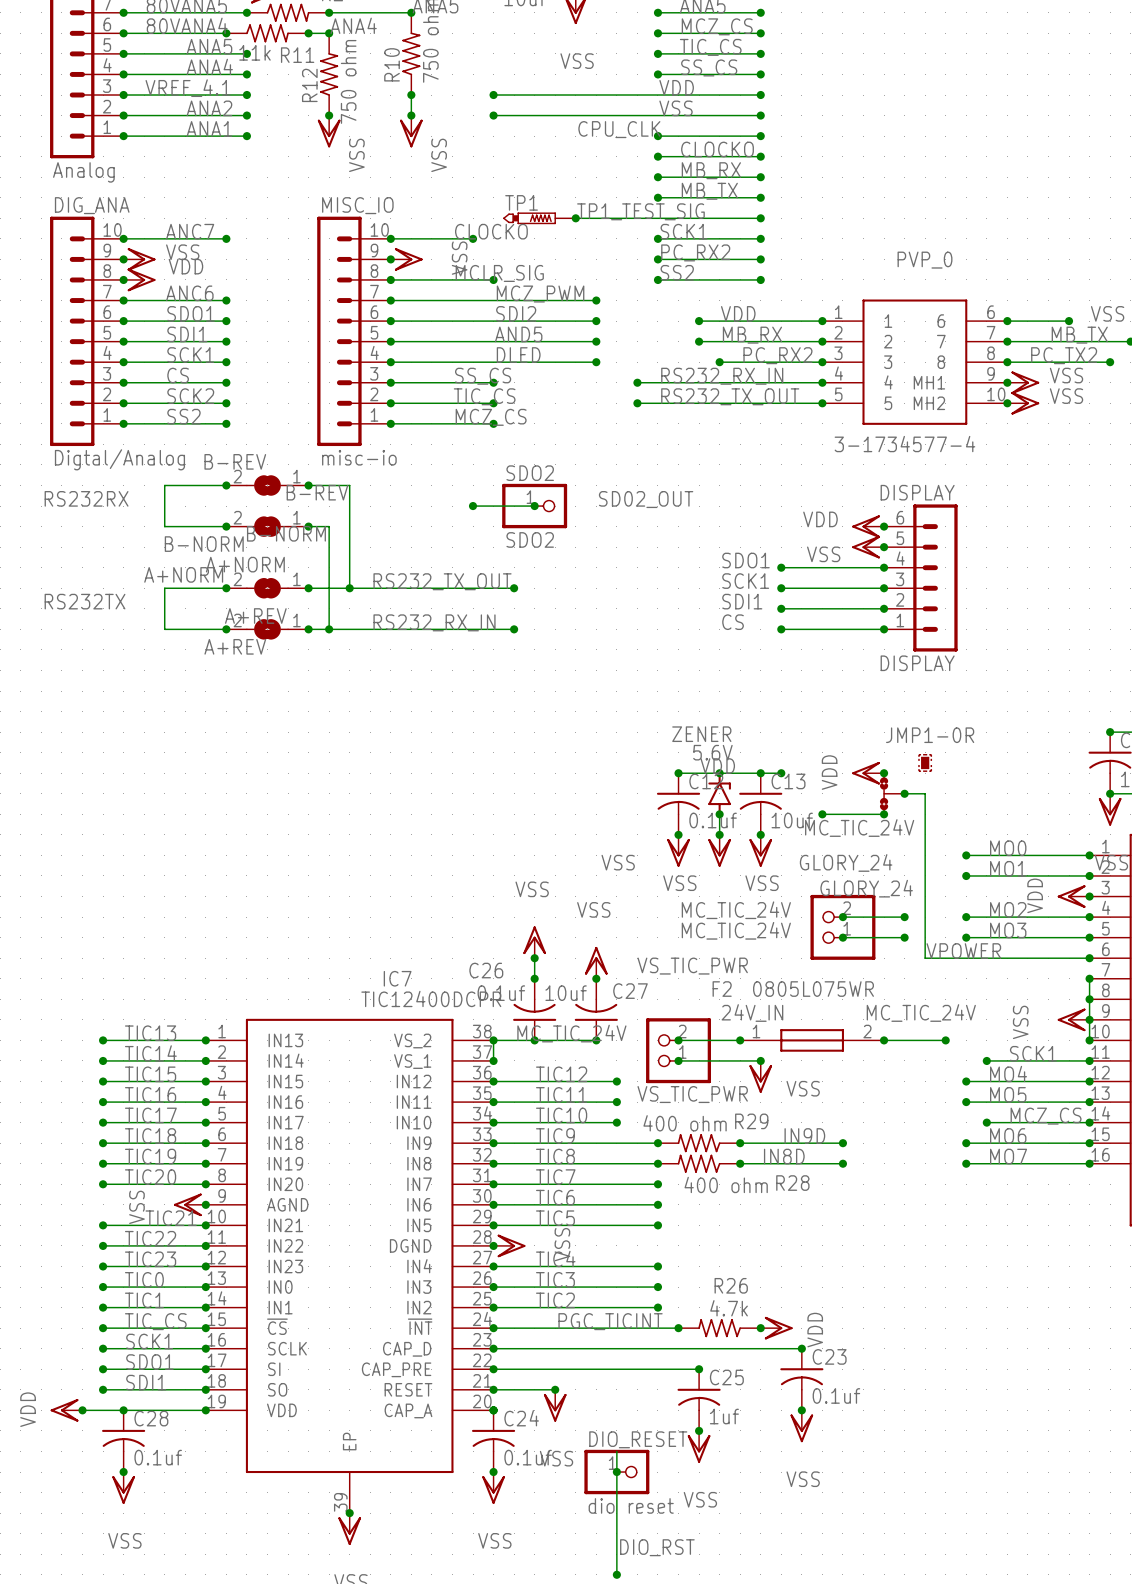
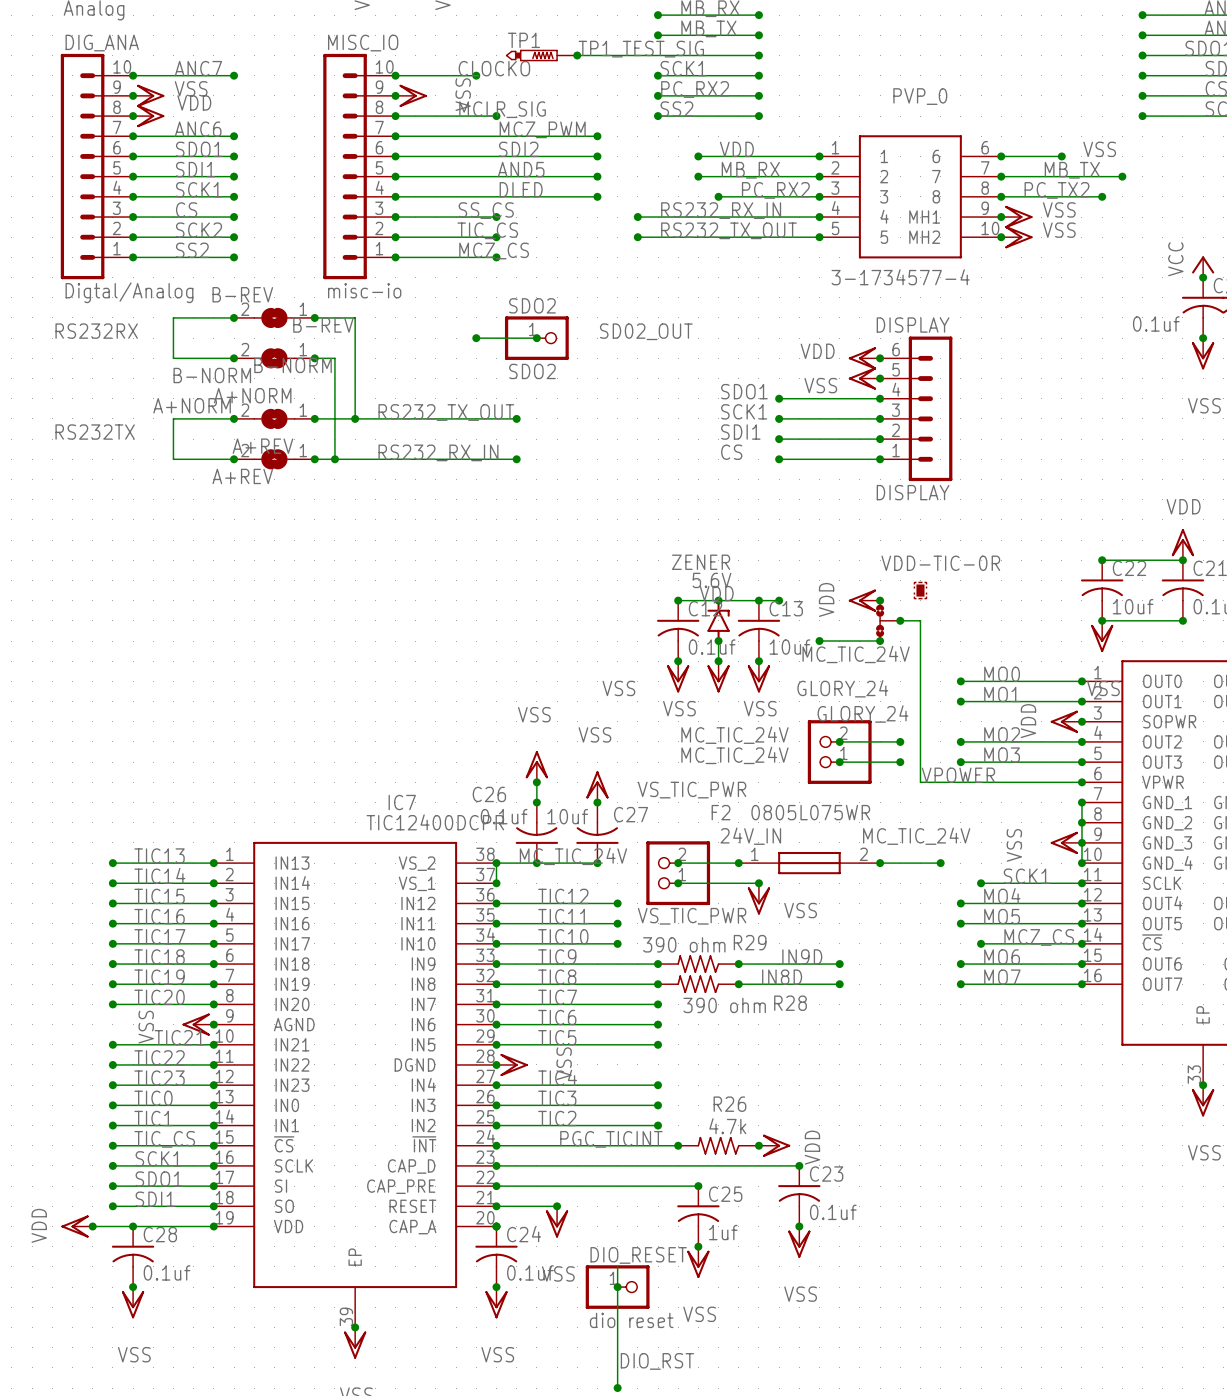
JMP1-0R name: JMP1-0R (930, 735) -> VDD-TIC-0R (940, 563)
R29 value: 400 ohm (685, 1123) -> 390 ohm (684, 944)
R28 value: 400 ohm (726, 1184) -> 390 ohm (724, 1005)

